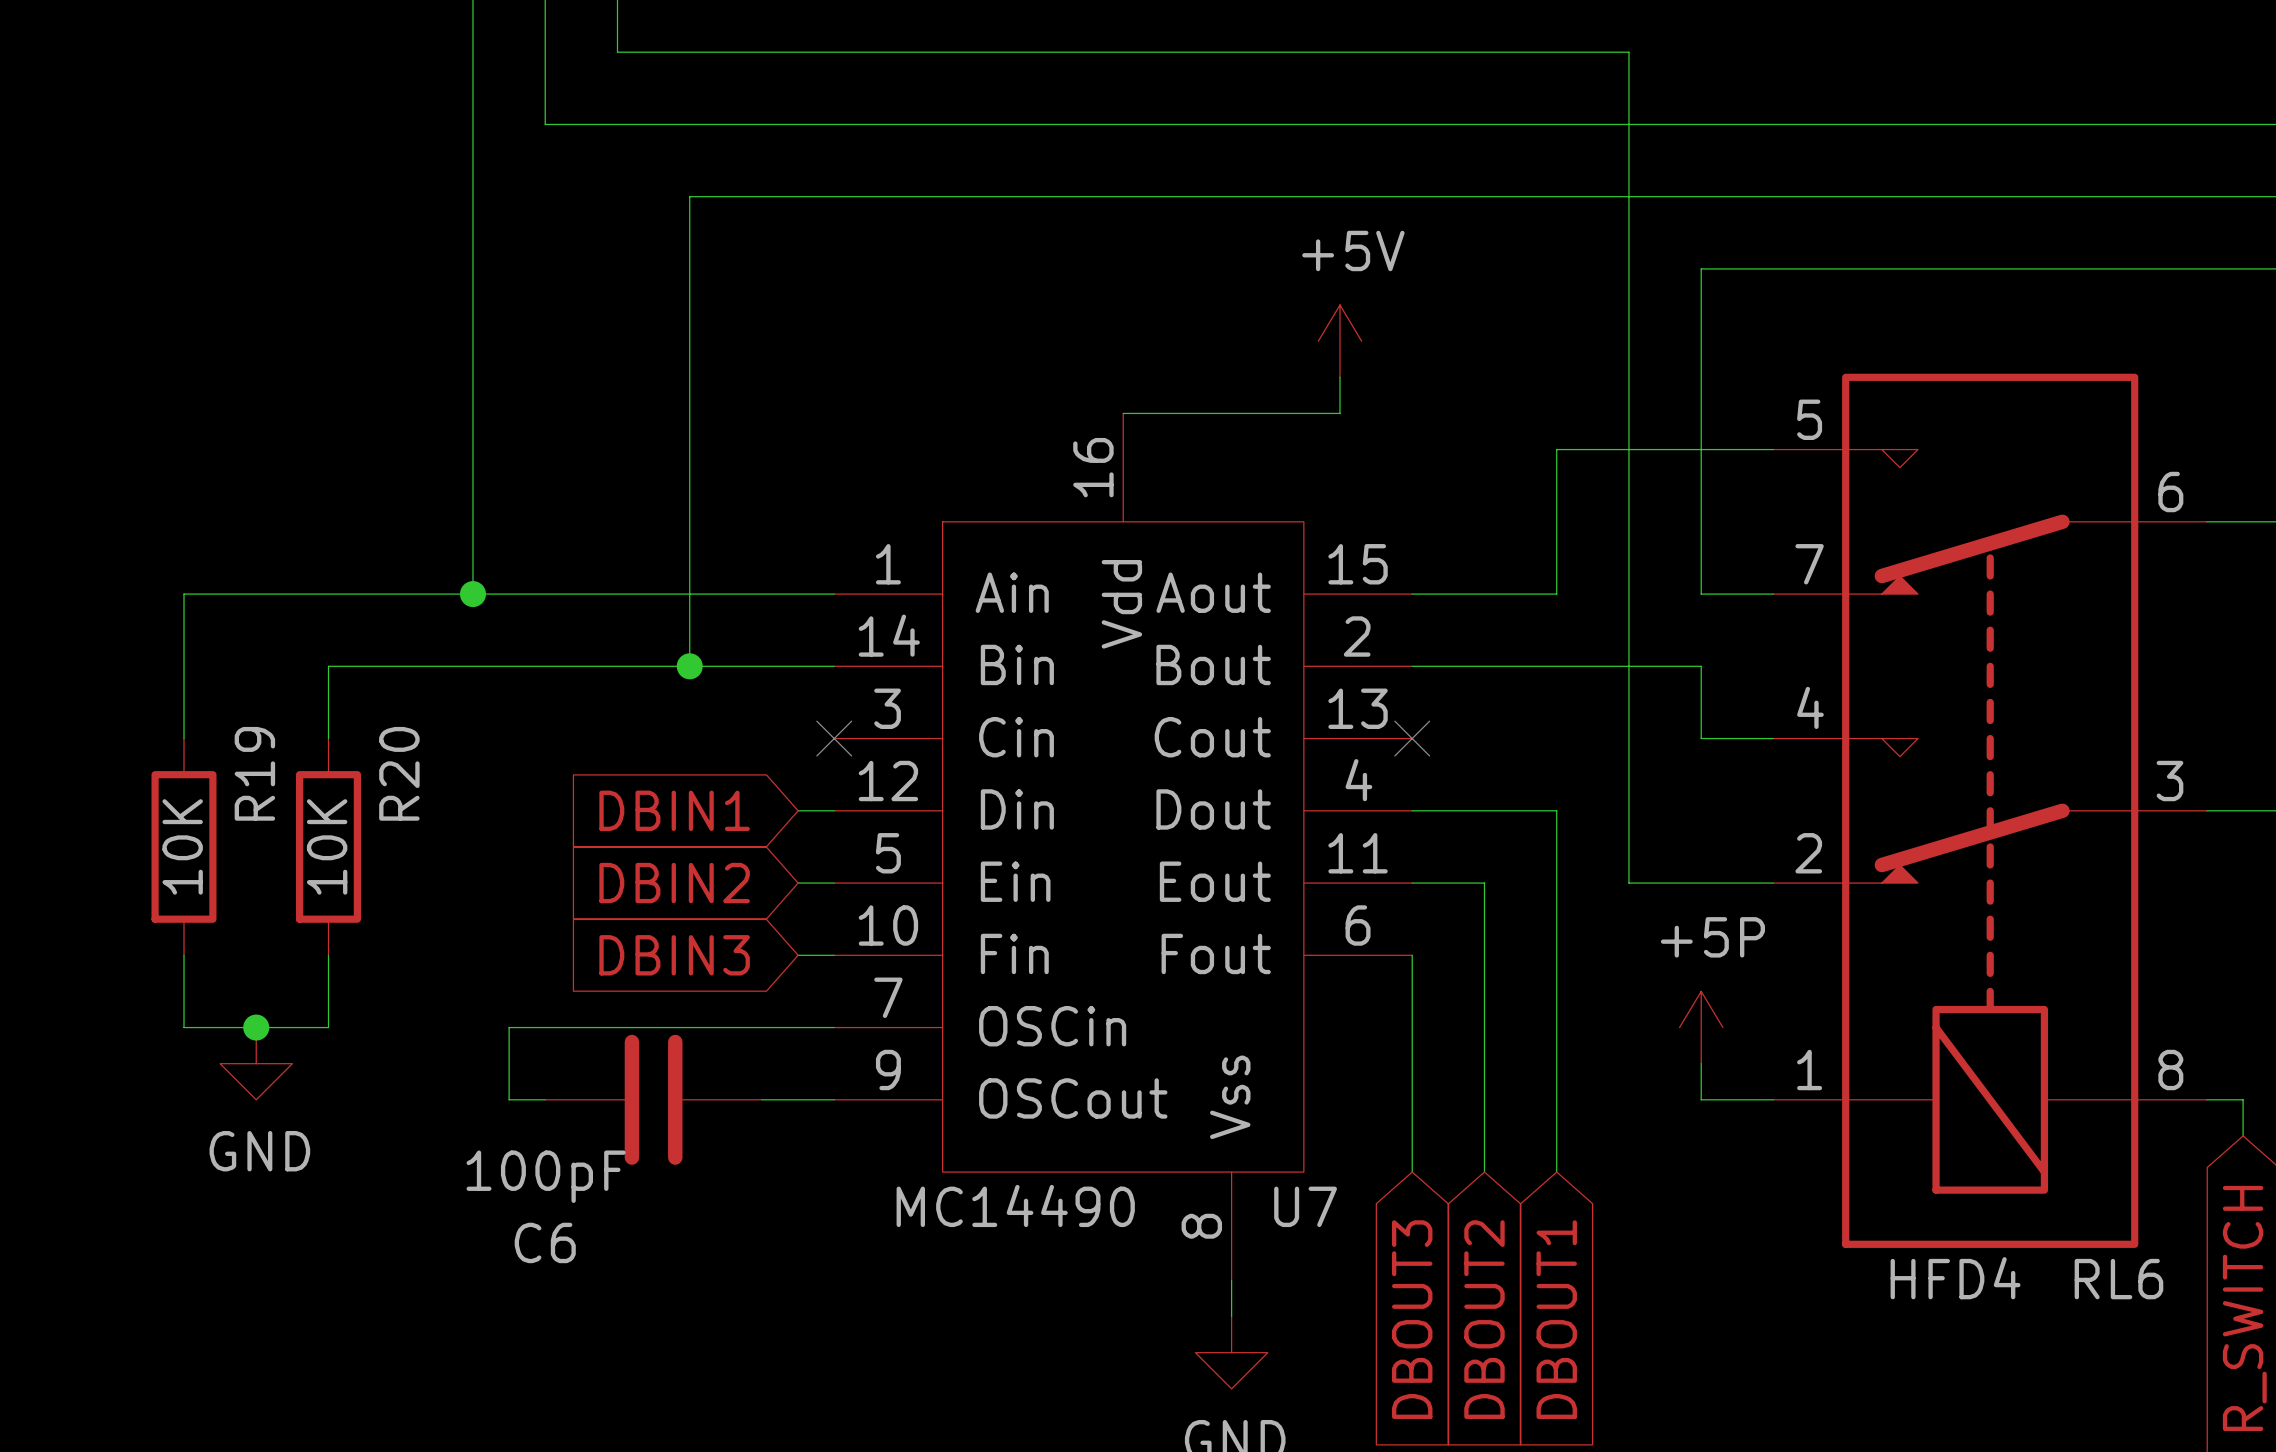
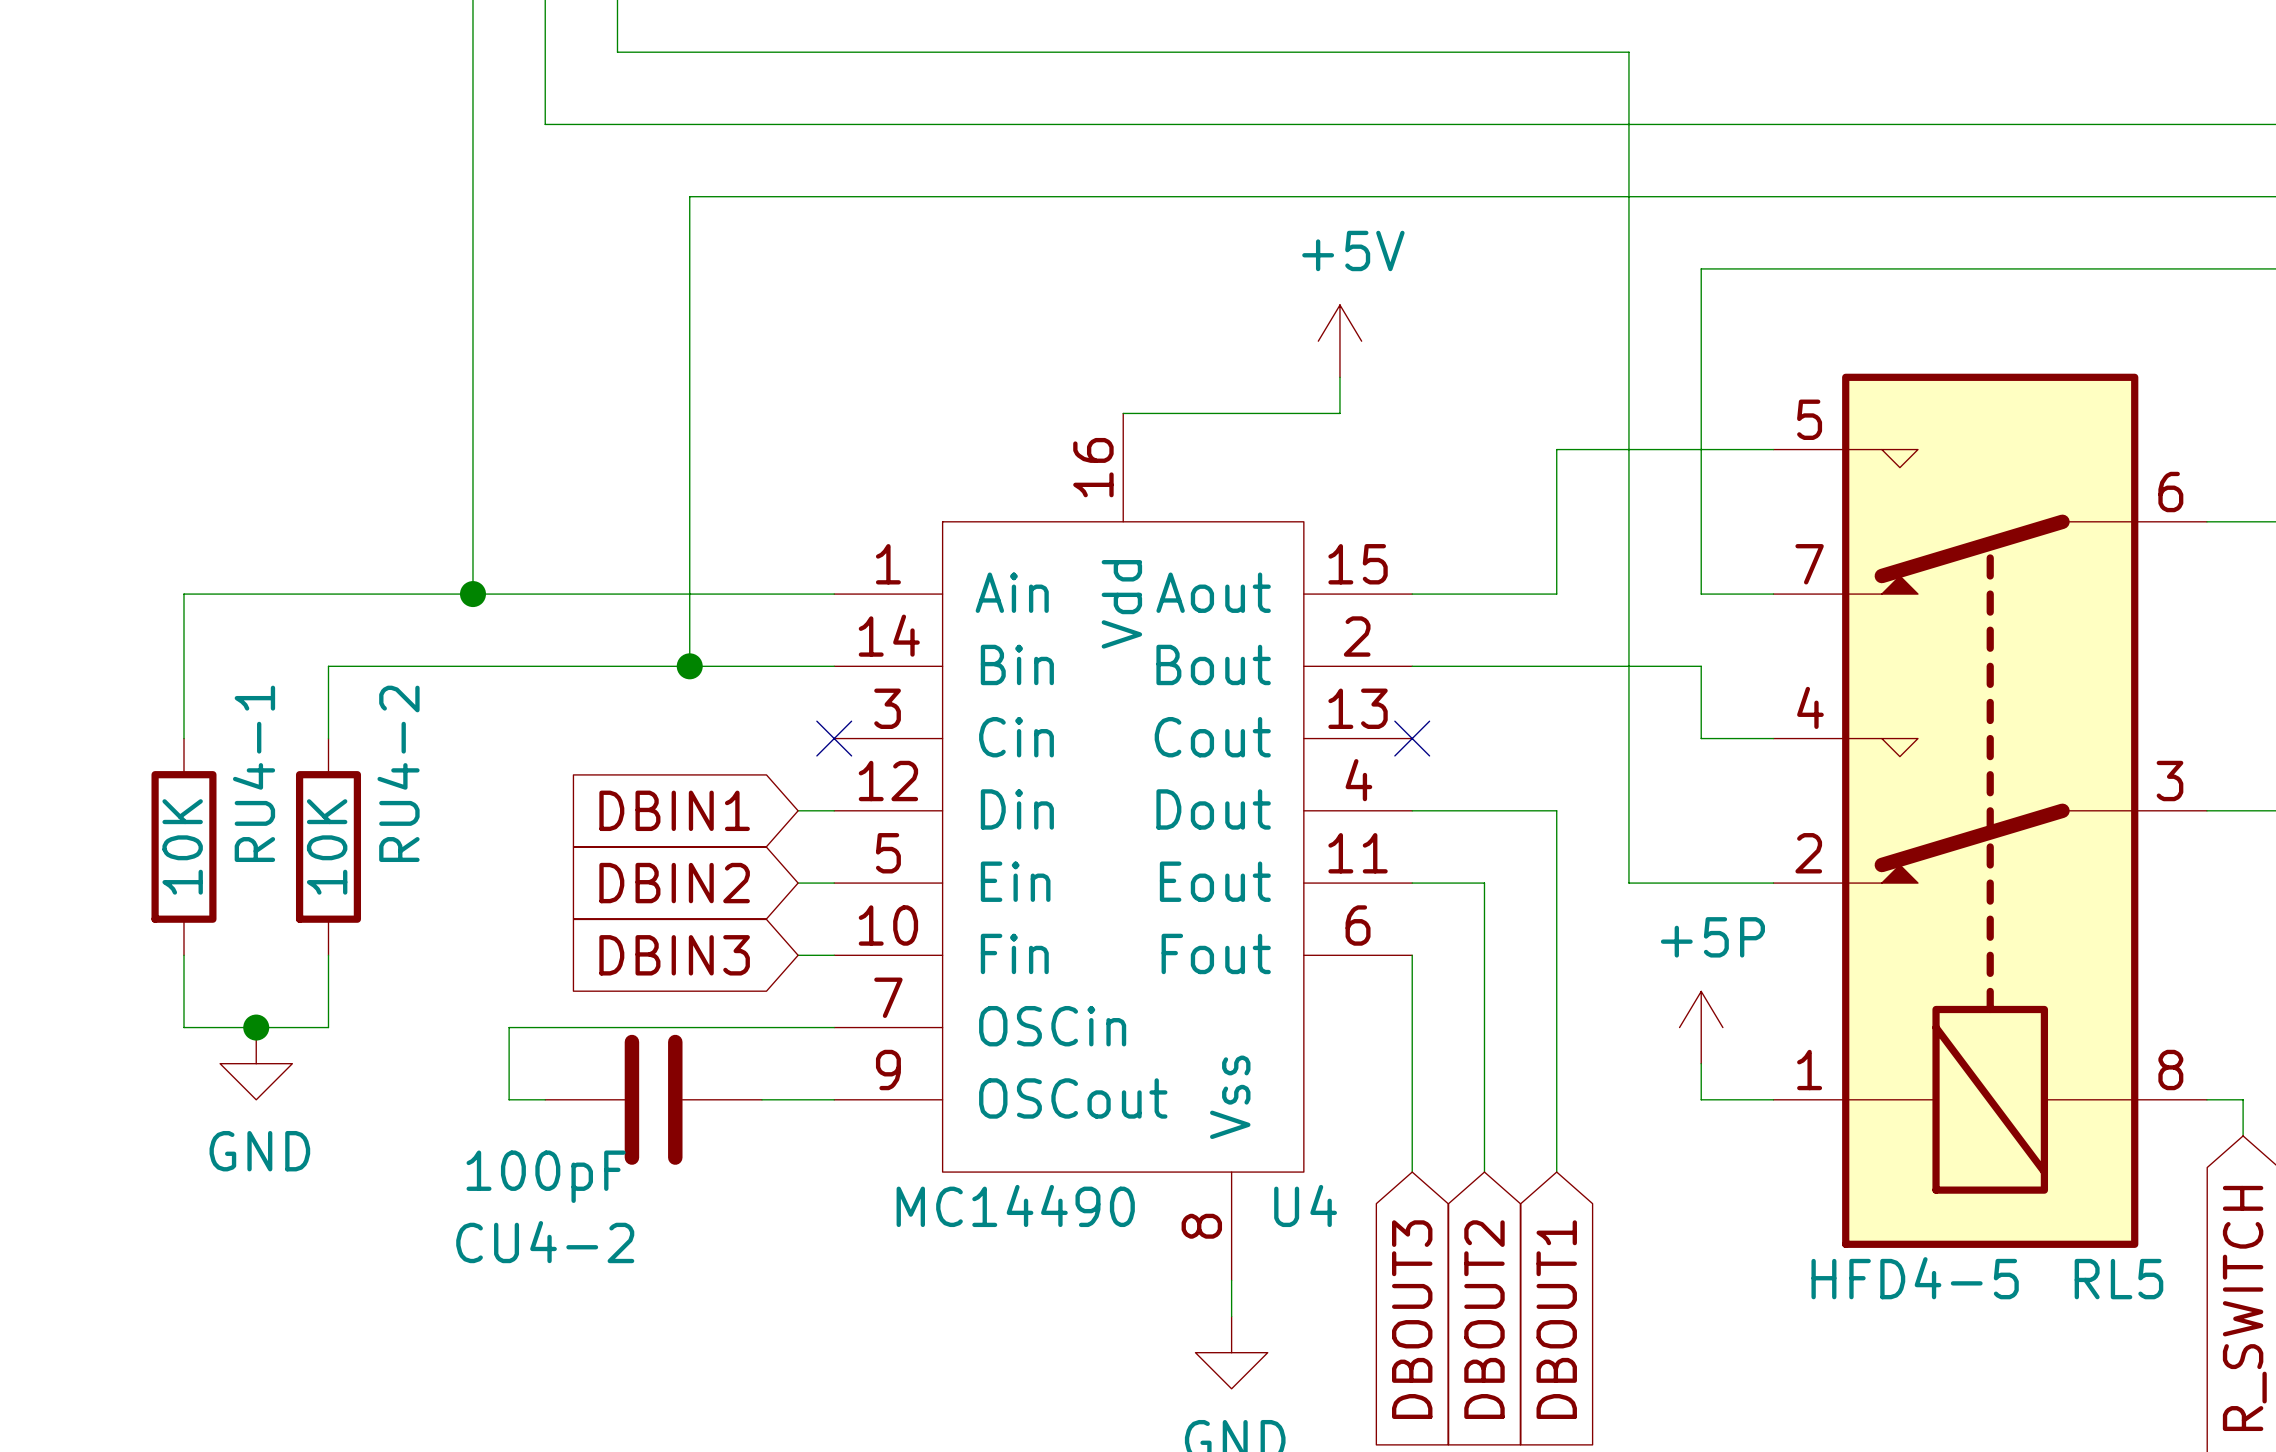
R19 name: R19 (254, 773) -> RU4-1 (254, 773)
R20 name: R20 (399, 773) -> RU4-2 (398, 773)
U7 name: U7 (1305, 1206) -> U4 (1305, 1205)
C6 name: C6 (545, 1242) -> CU4-2 (545, 1242)
RL6 value: HFD4 (1955, 1278) -> HFD4-5 (1915, 1278)
RL6 name: RL6 (2118, 1279) -> RL5 (2118, 1279)

